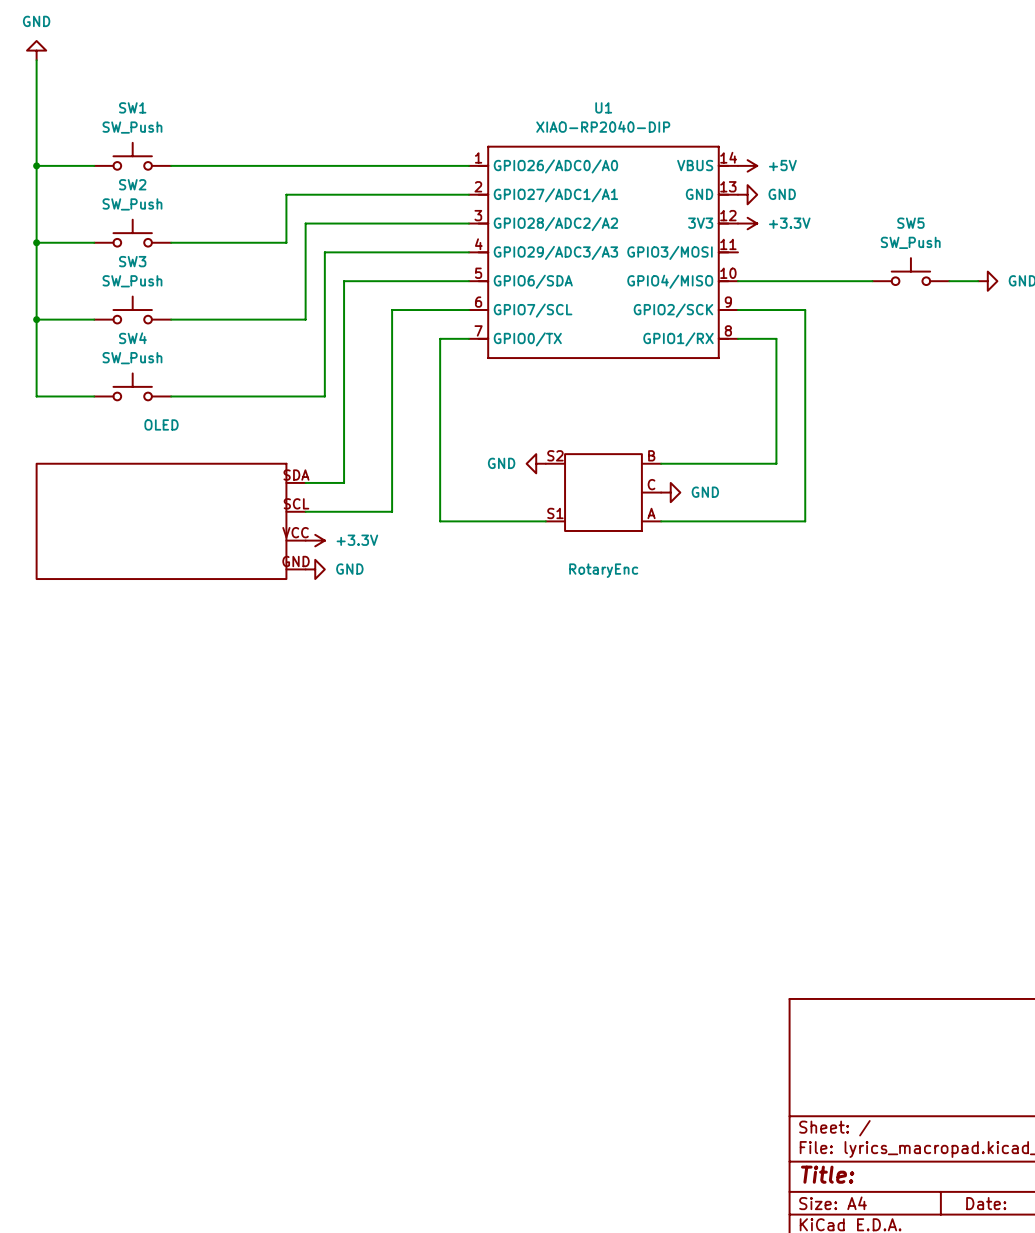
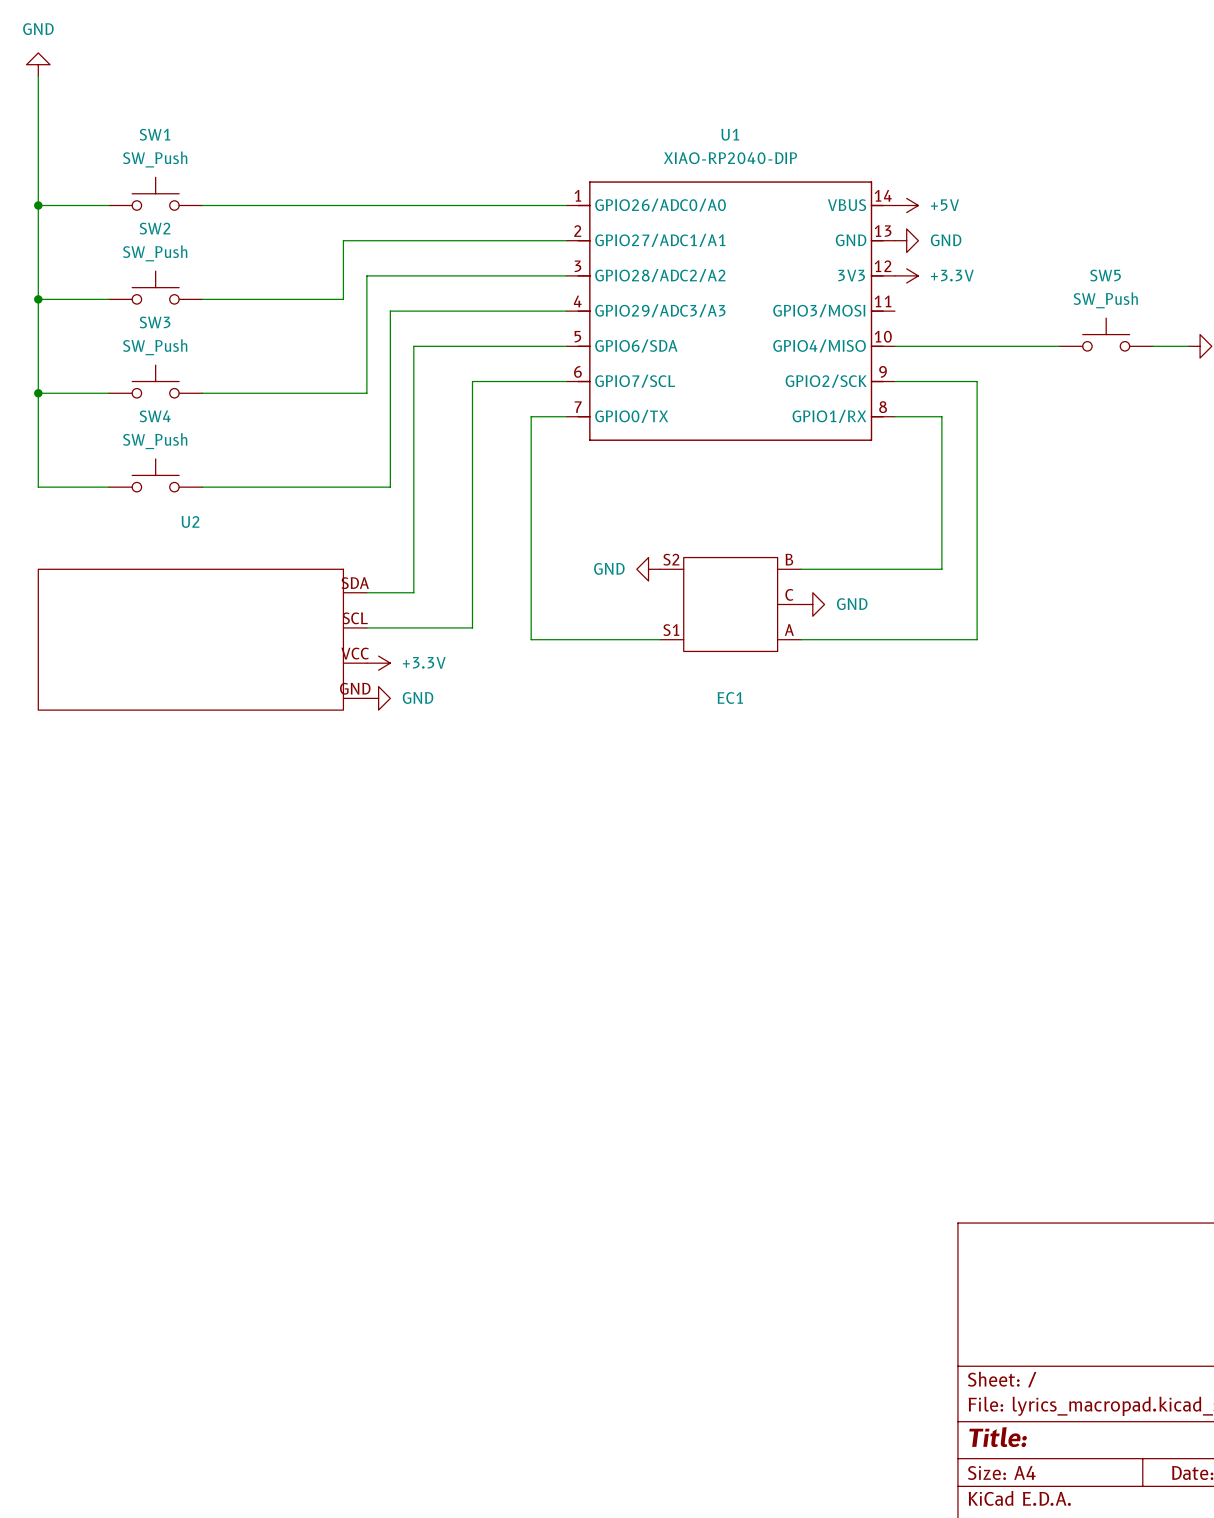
OLED name: OLED (161, 424) -> U2 (190, 521)
RotaryEnc name: RotaryEnc (603, 570) -> EC1 (730, 698)

